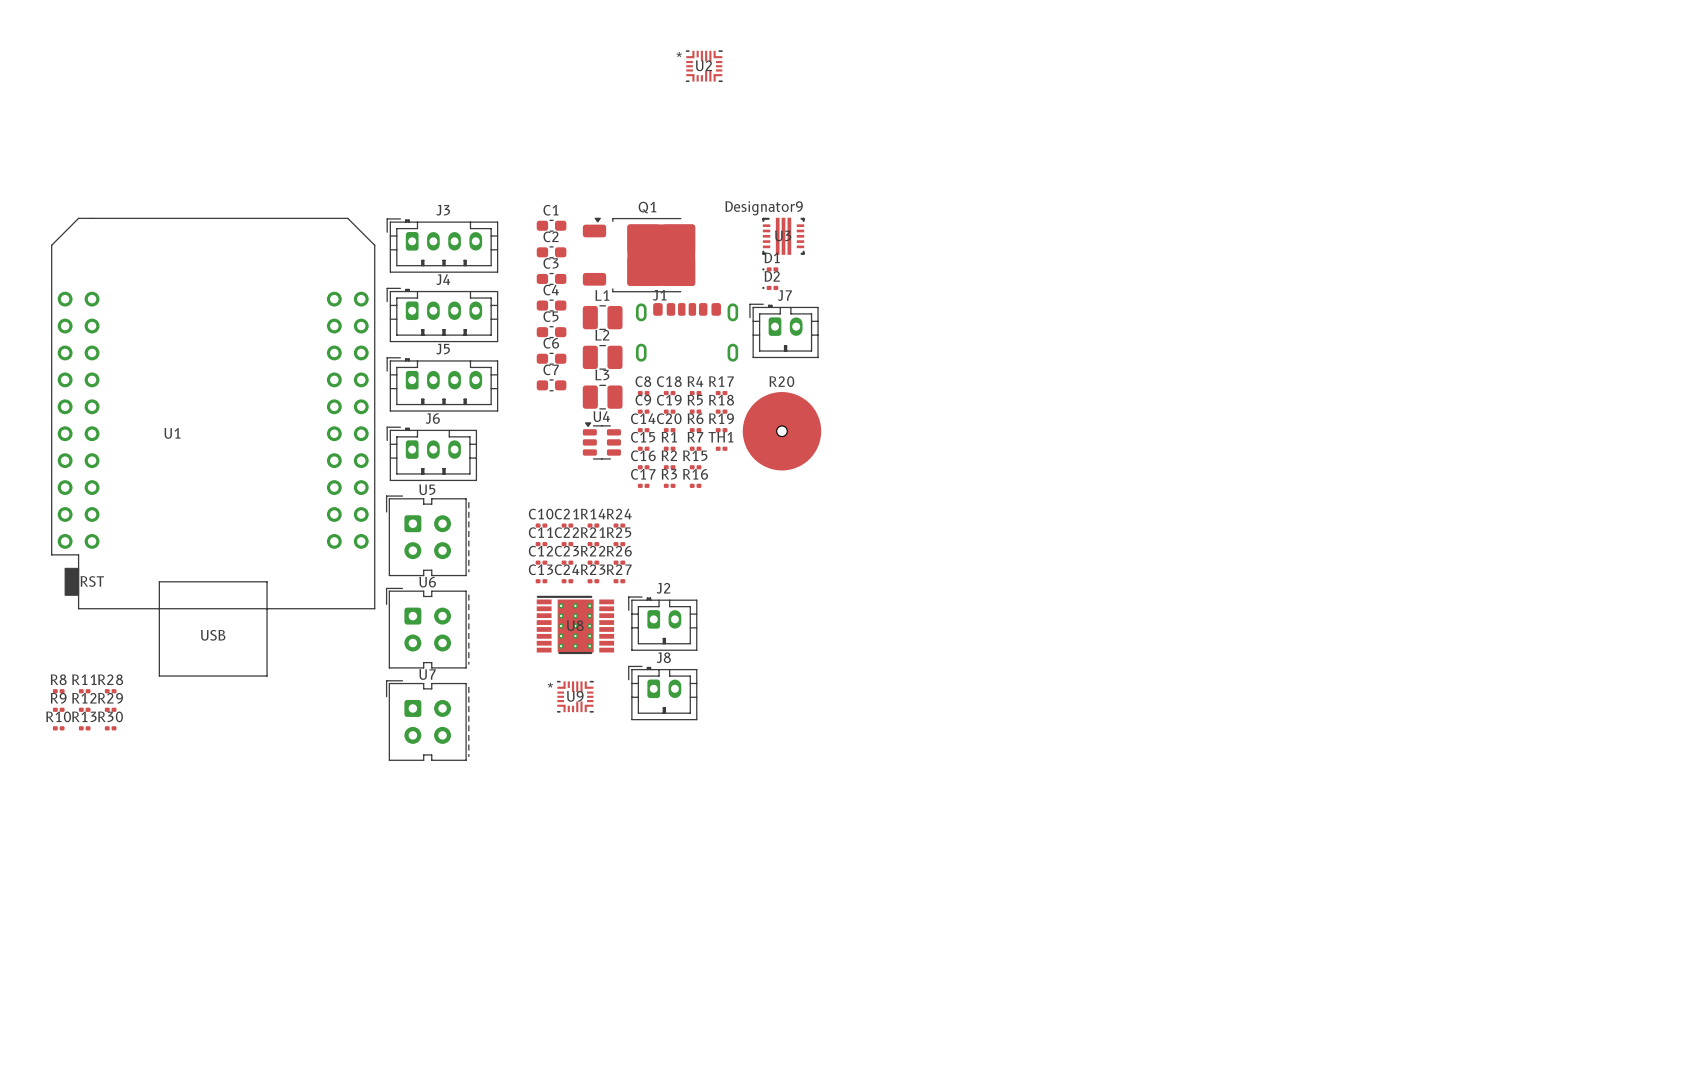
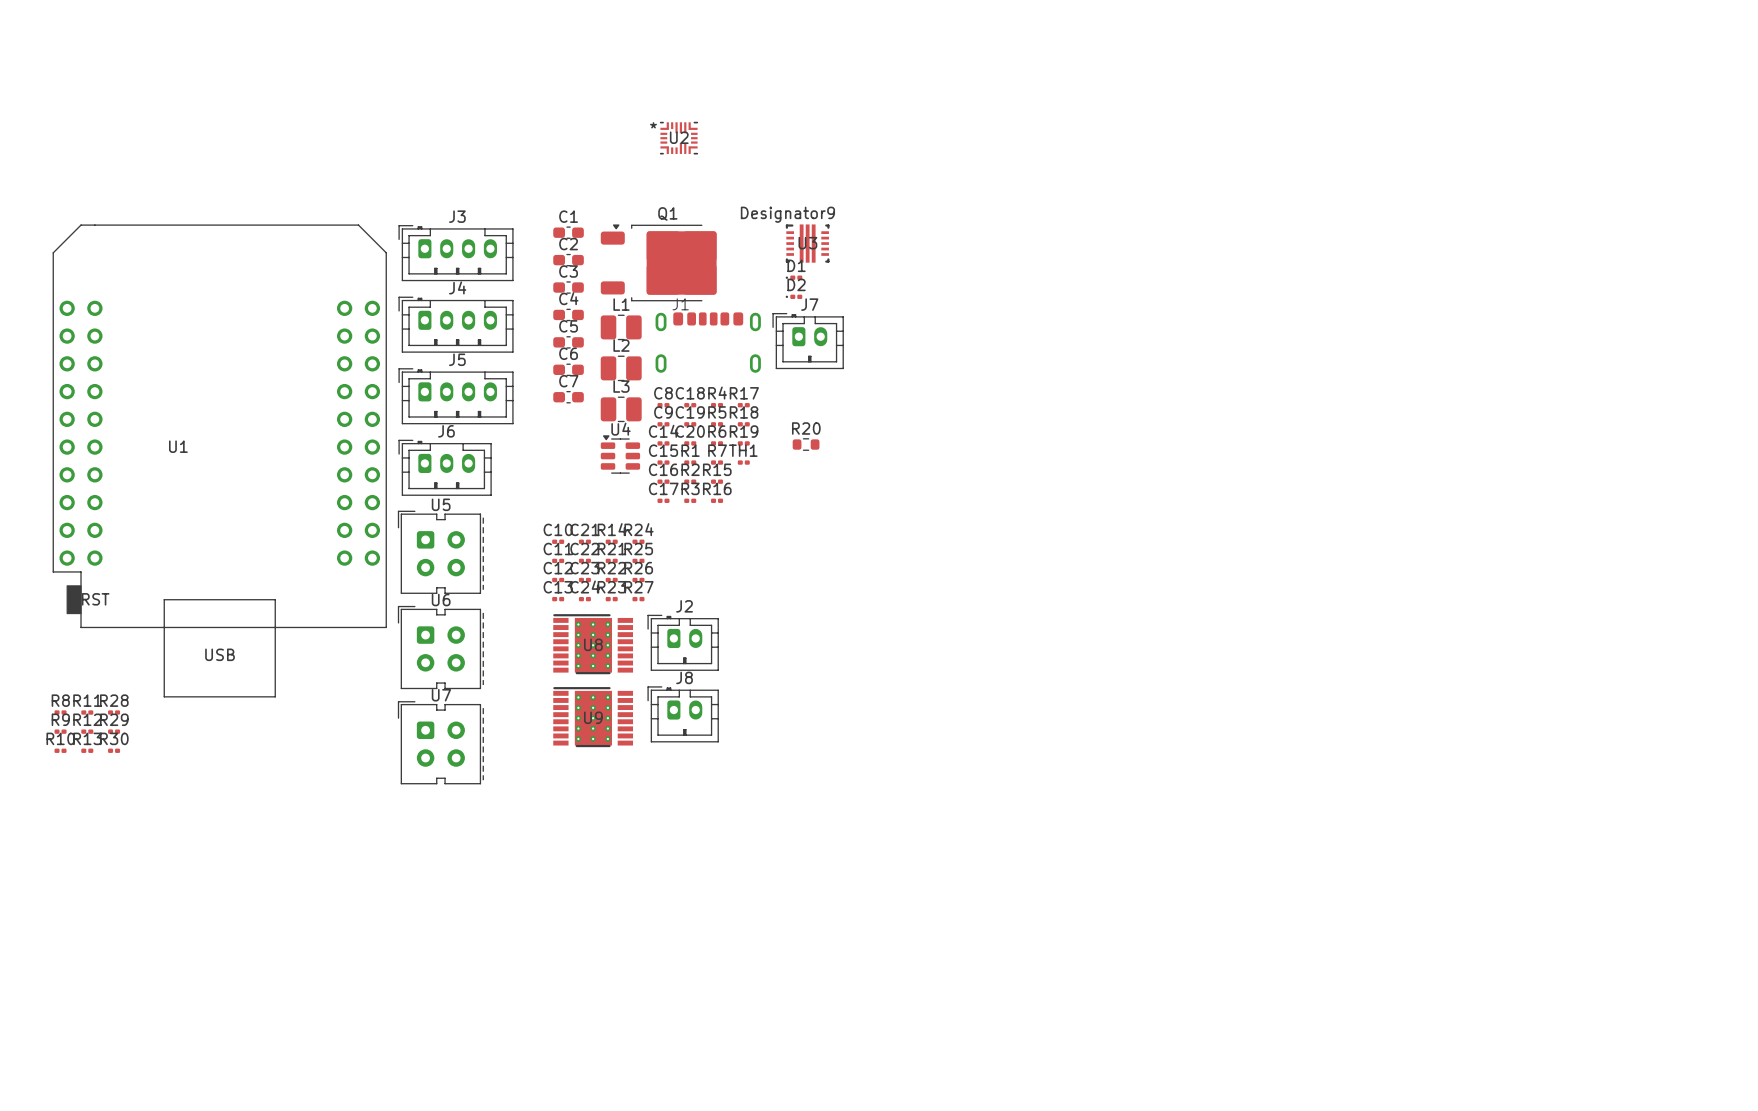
U2 position: (704, 66) -> (679, 138)
R20 name position: R20 (781, 381) -> R20 (806, 428)
R20 footprint: [742, 392, 822, 471] -> [792, 438, 820, 451]
U9 footprint: [556, 680, 594, 713] -> [553, 687, 634, 748]

